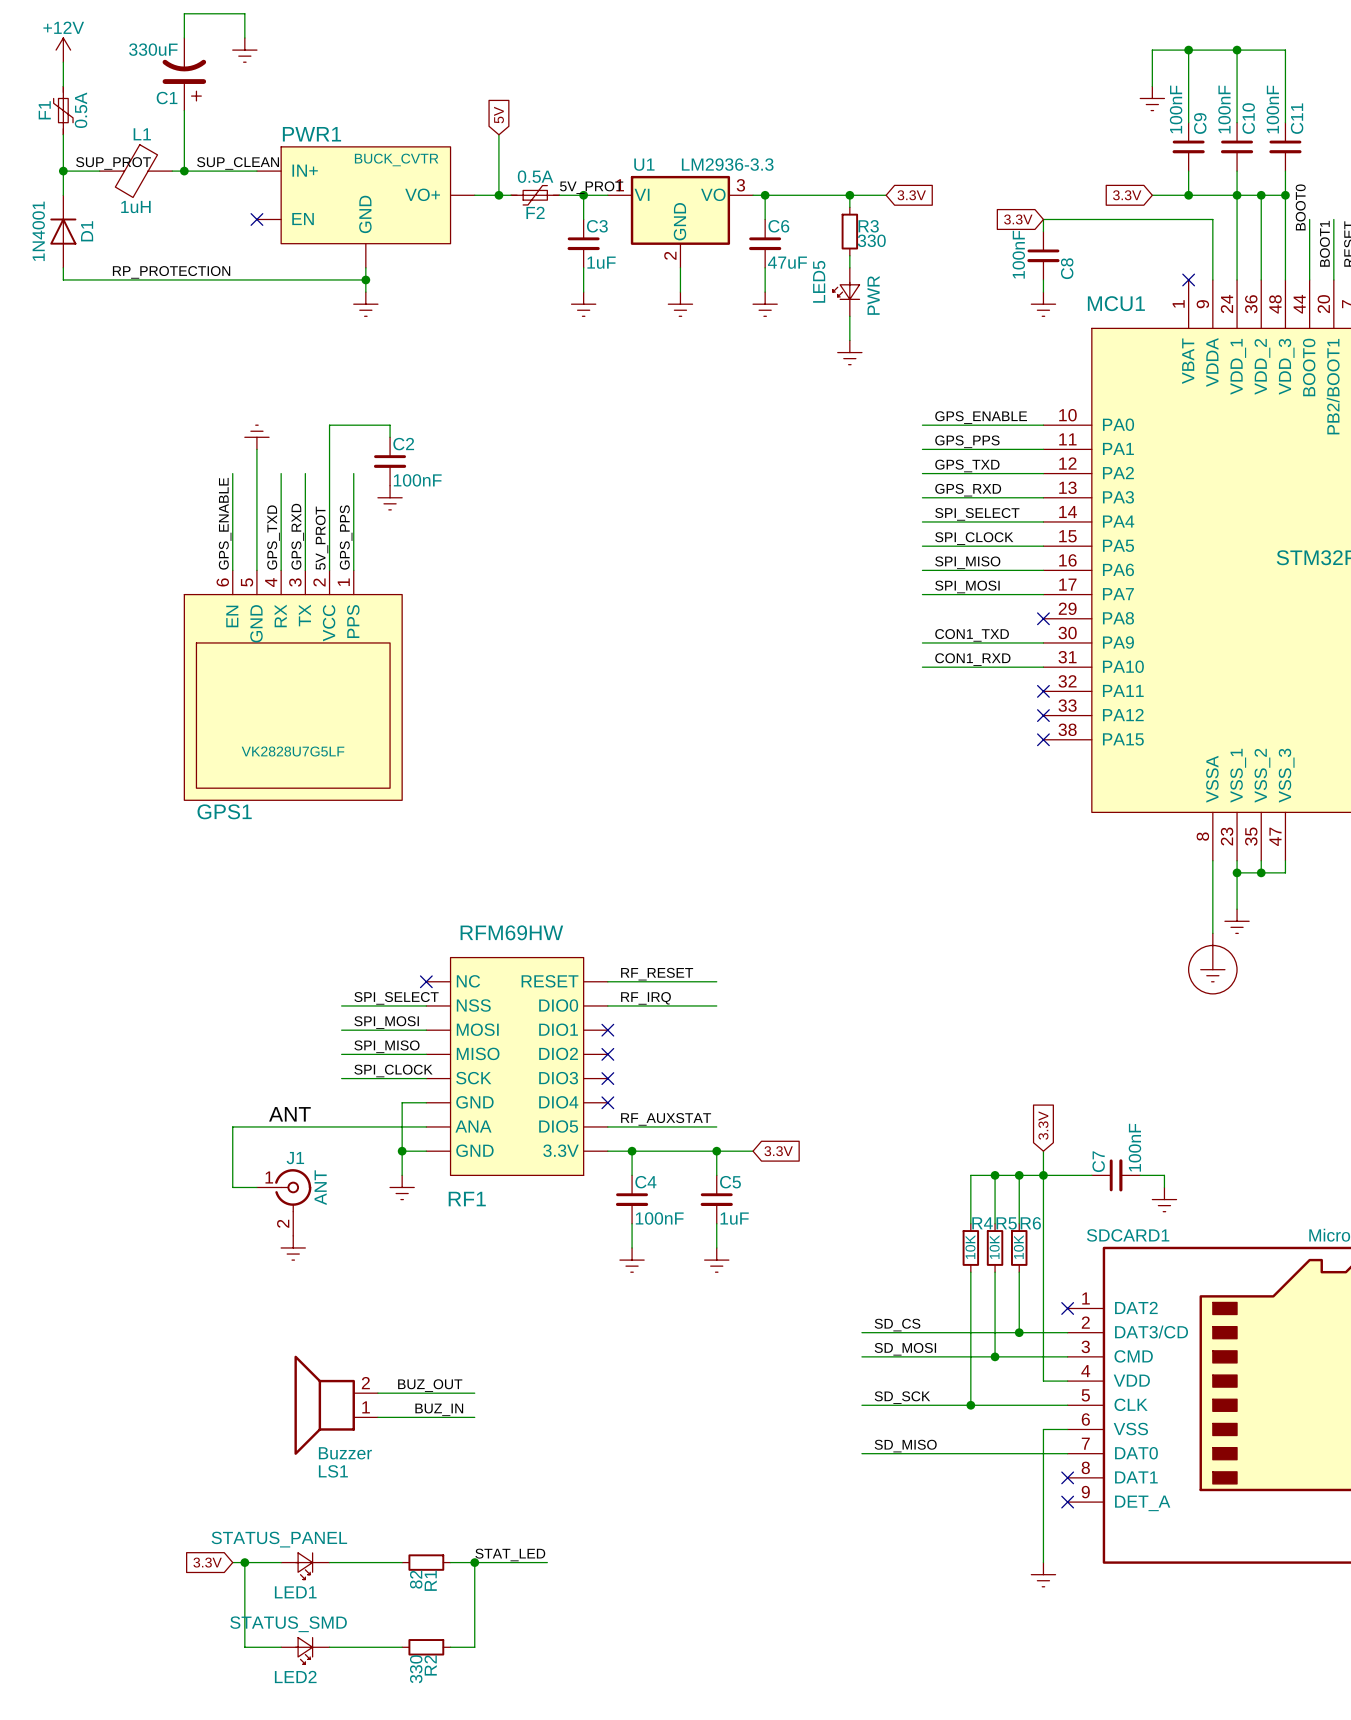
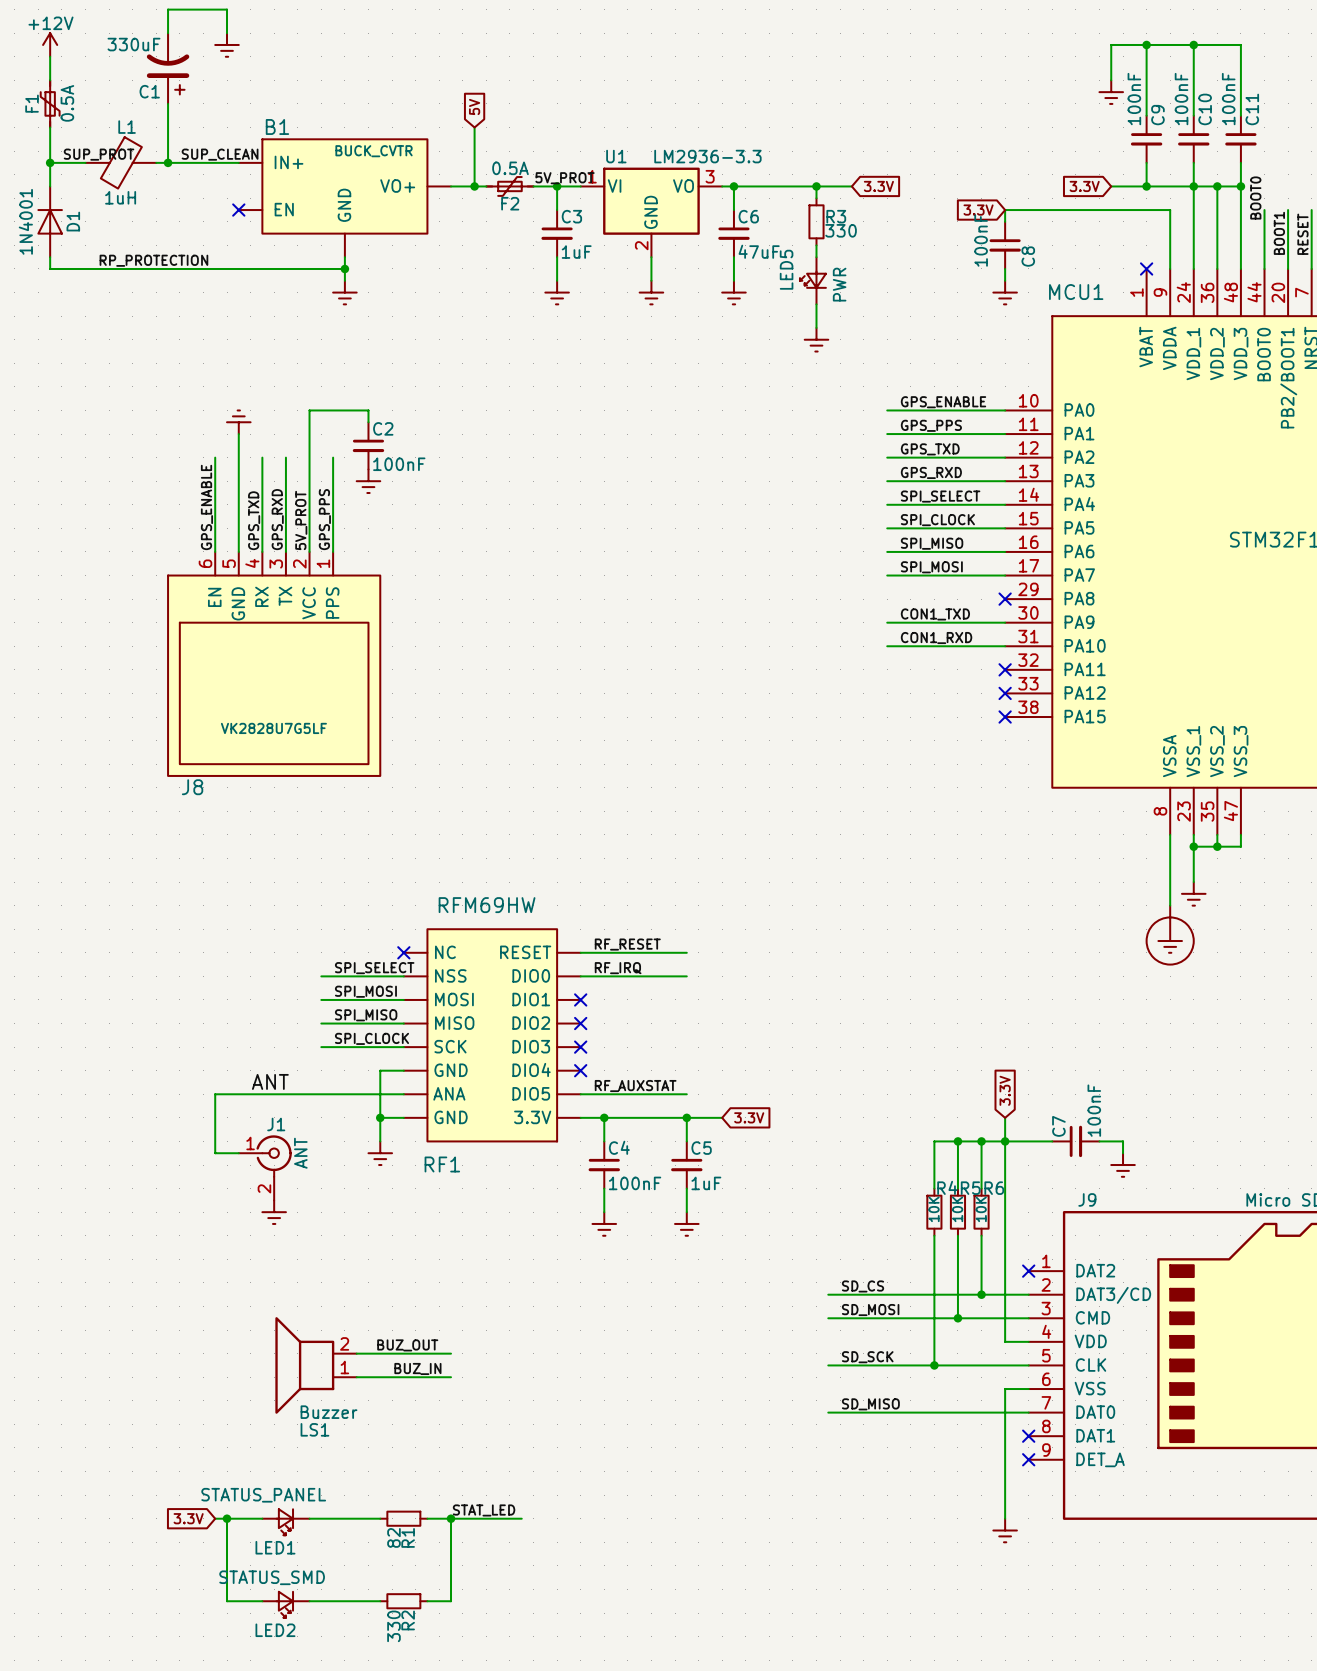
PWR1 name: PWR1 (311, 134) -> B1 (277, 126)
GPS1 name: GPS1 (224, 811) -> J8 (192, 787)
SDCARD1 name: SDCARD1 (1128, 1235) -> J9 (1087, 1199)

